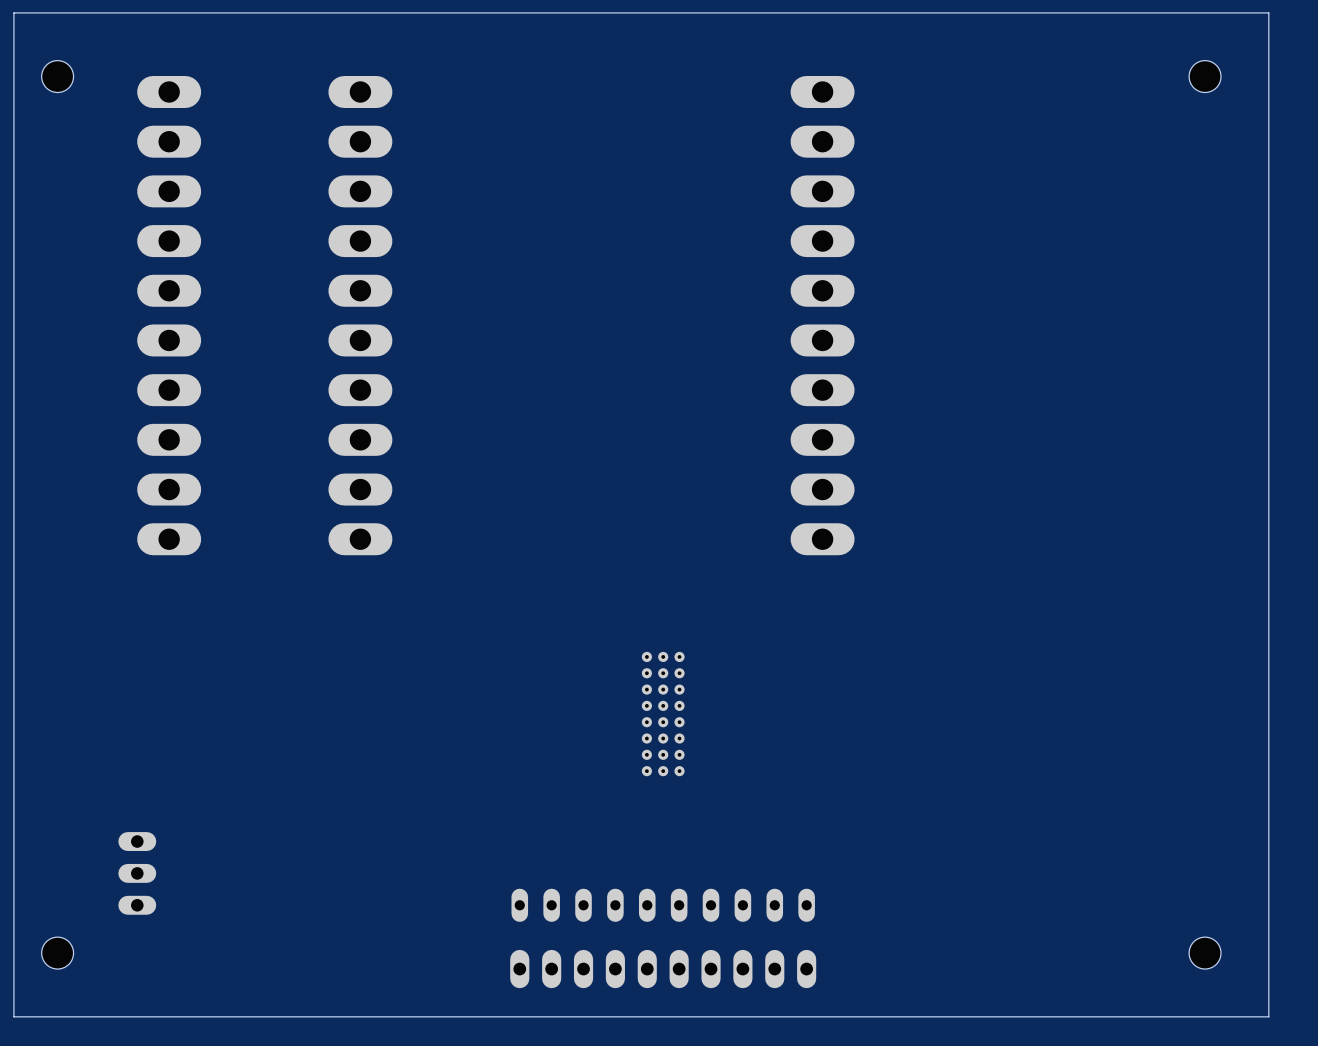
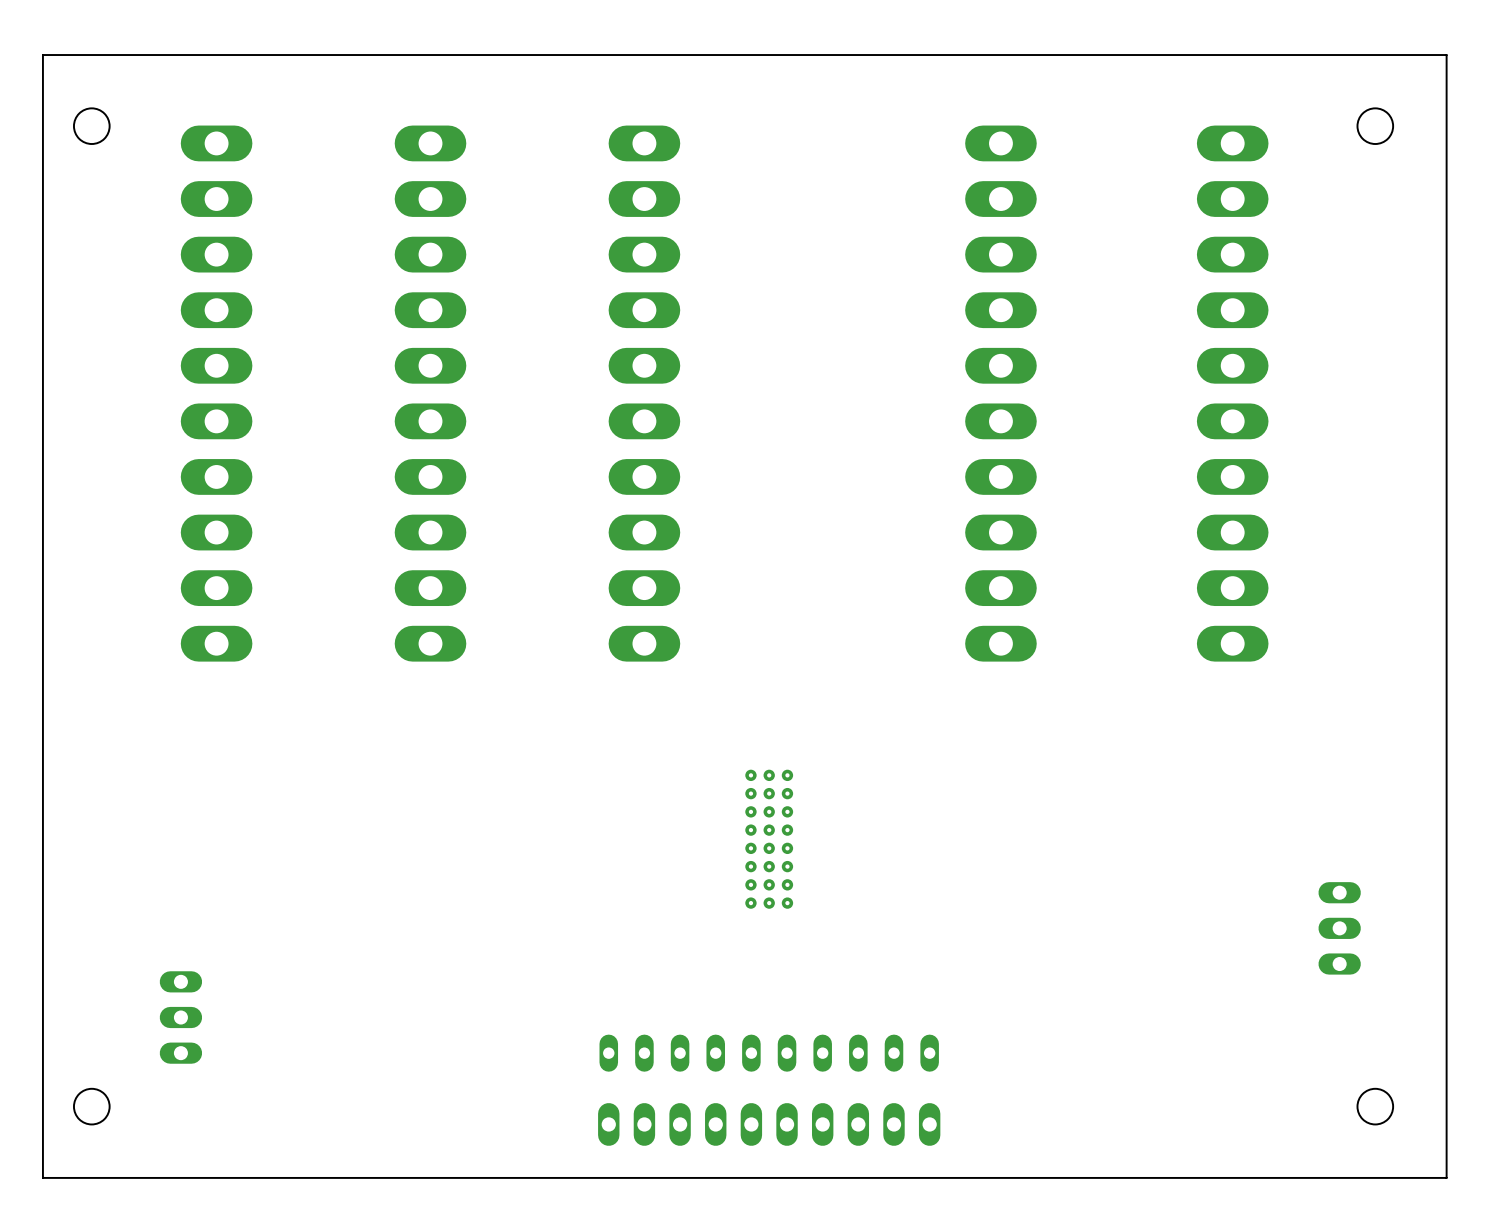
part: none -> (644, 393)
part position: (822, 315) -> (1000, 393)
part: none -> (1232, 393)
part: none -> (1339, 928)

